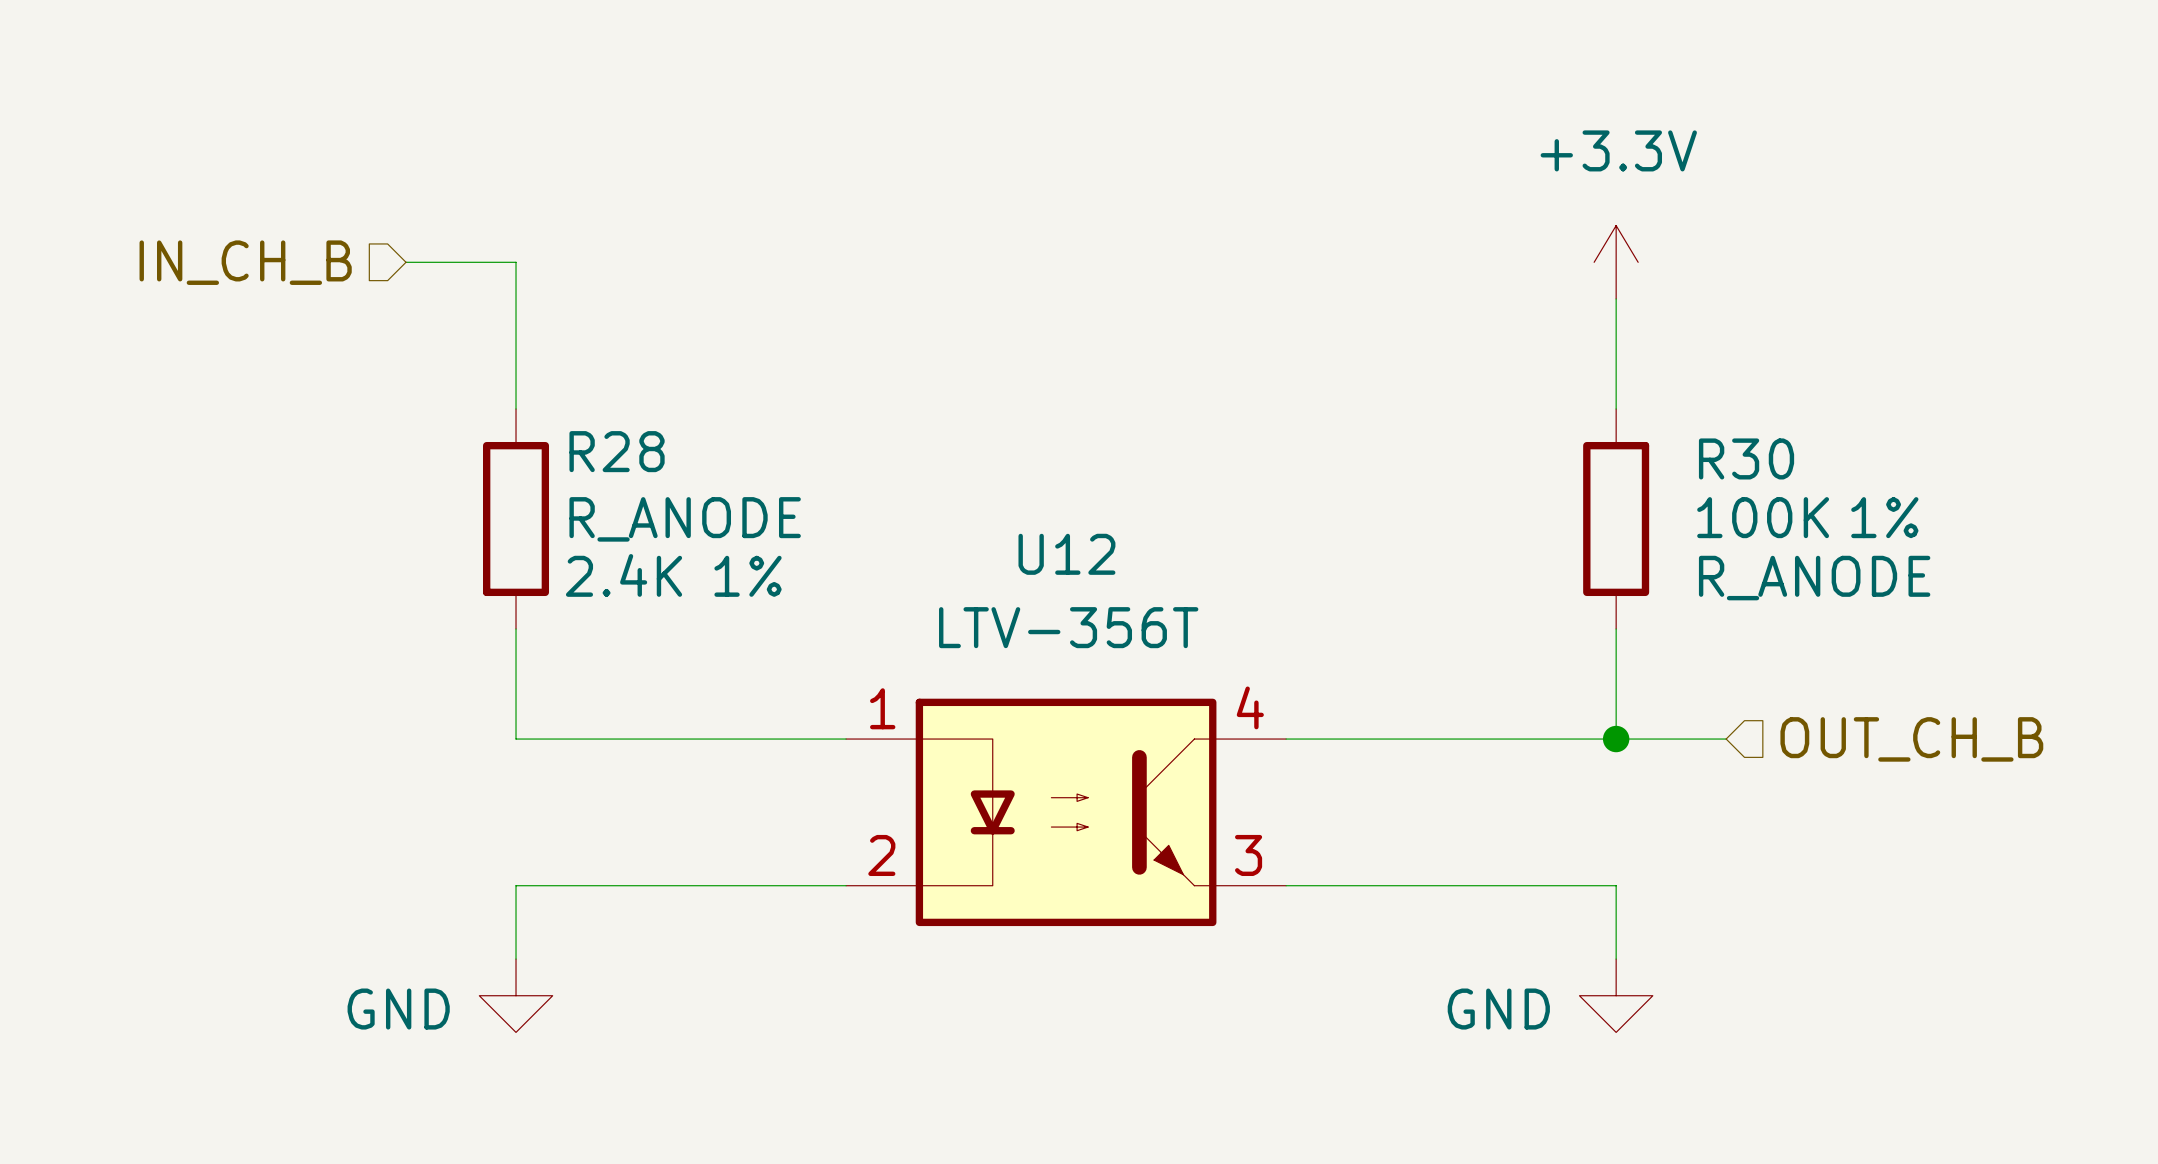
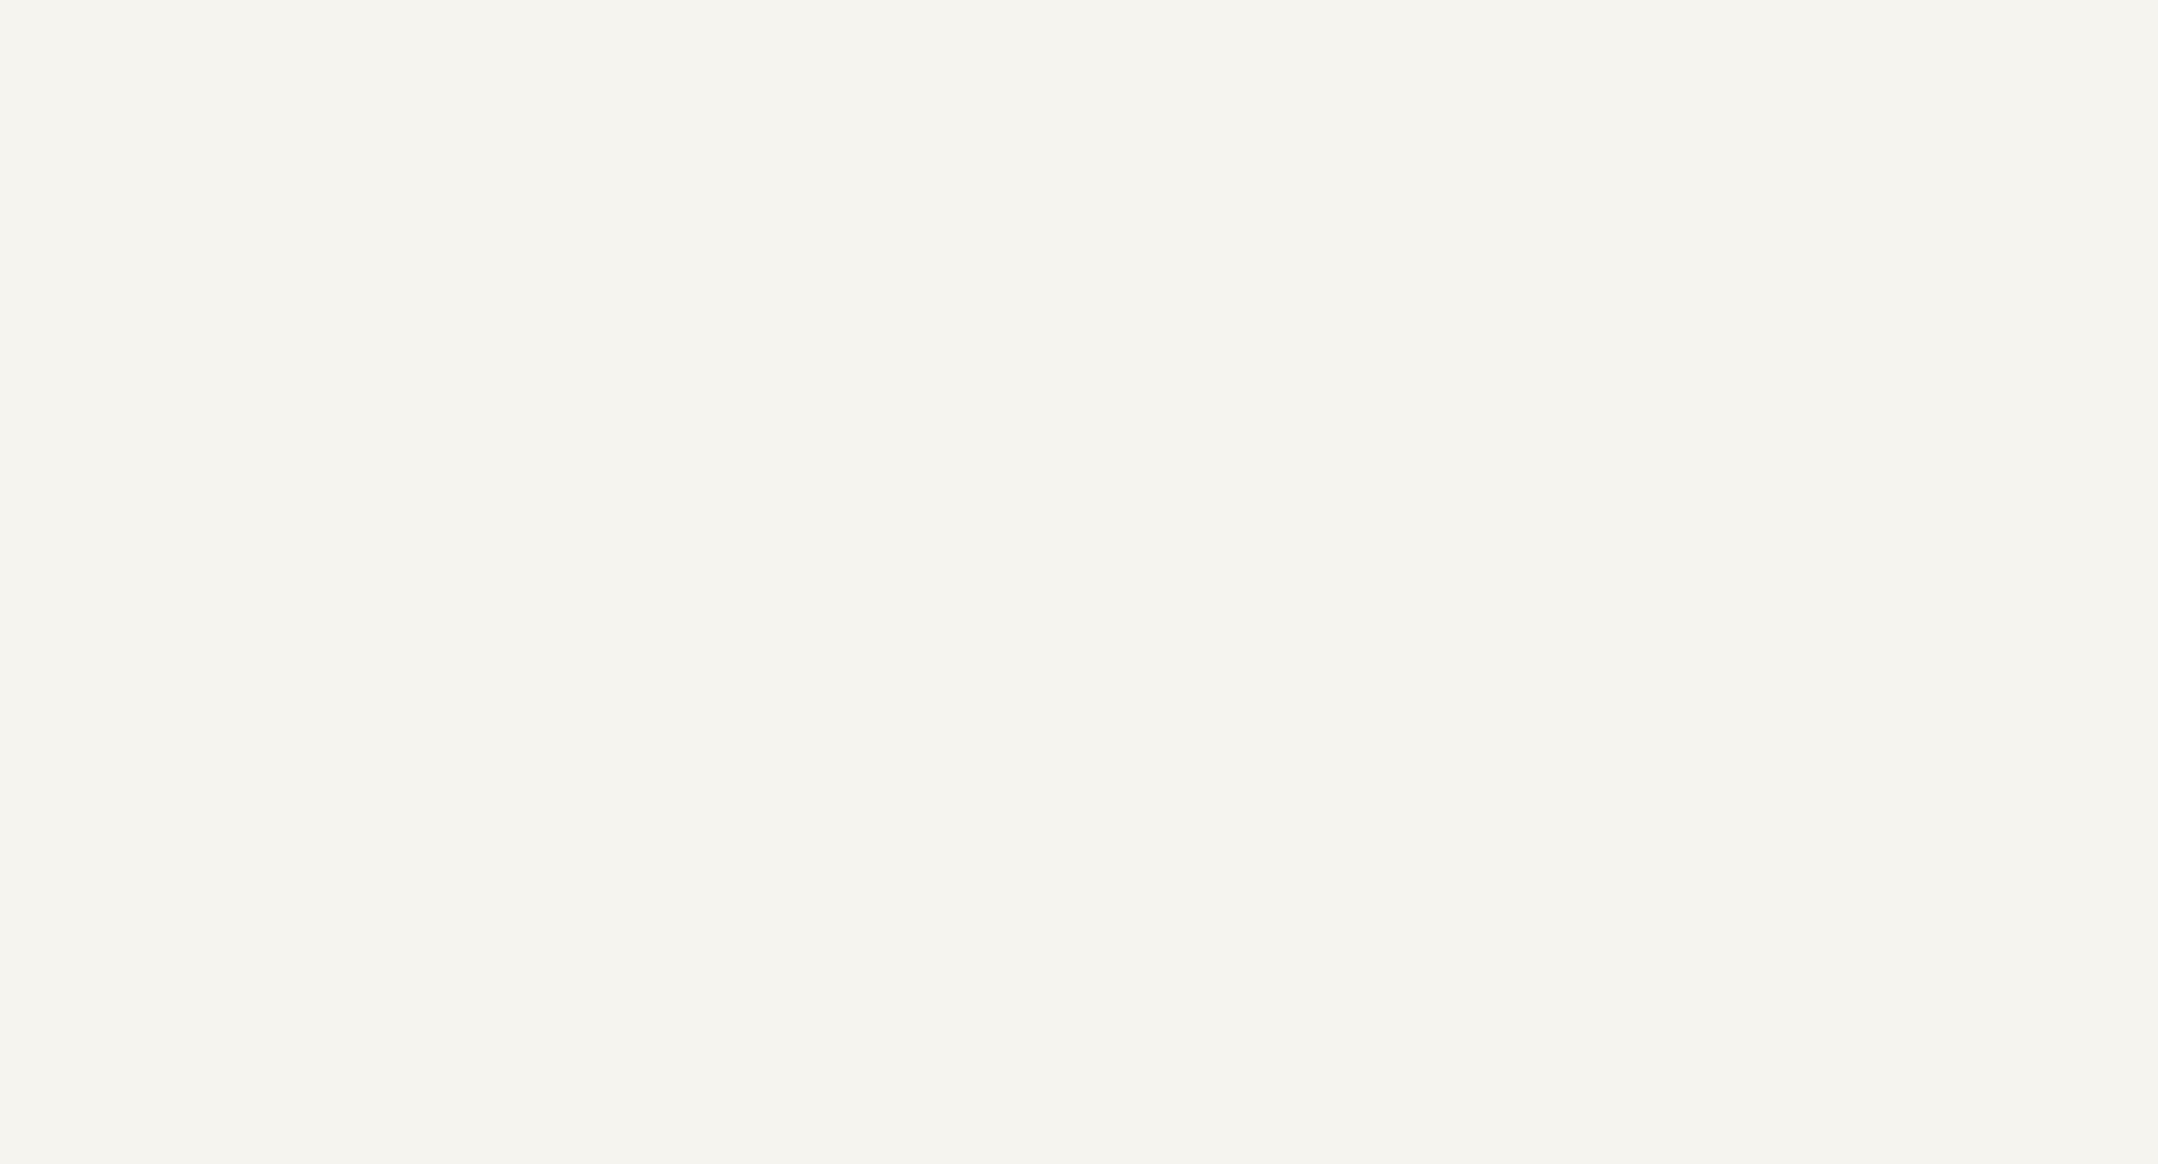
hierarchical label: IN_CH_B (245, 262) -> none
wire: (405, 262) (516, 262) (516, 408) -> none
power symbol: +3.3V (1616, 262) -> none
wire: (1616, 298) (1616, 408) -> none
R28: 2.4K (516, 519) -> none
R30: 100K (1616, 519) -> none
wire: (516, 629) (516, 739) (846, 739) -> none
wire: (1616, 629) (1616, 739) -> none
wire: (1286, 739) (1726, 739) -> none
junction: (1616, 739) -> none
hierarchical label: OUT_CH_B (1911, 739) -> none
U12: LTV-356T (1066, 812) -> none
wire: (846, 885) (516, 885) (516, 959) -> none
wire: (1286, 885) (1616, 885) (1616, 959) -> none
power symbol: GND (516, 995) -> none
power symbol: GND (1616, 995) -> none

